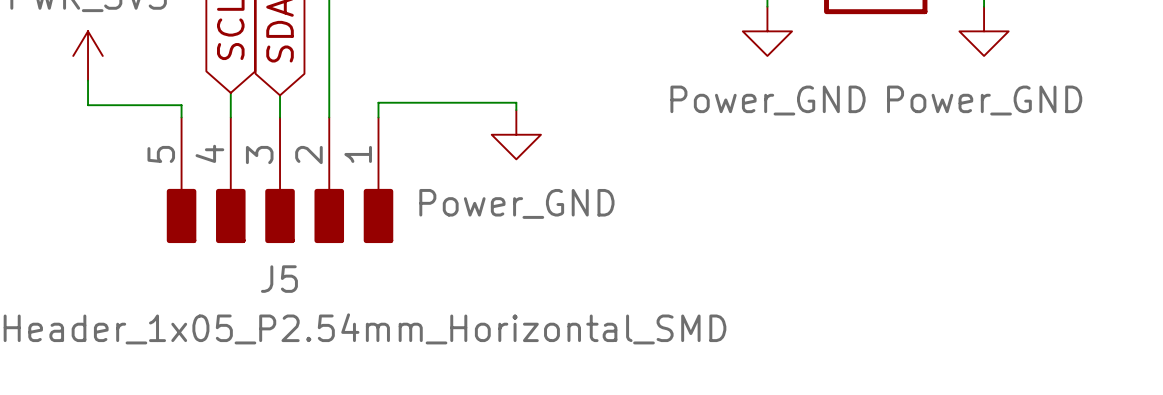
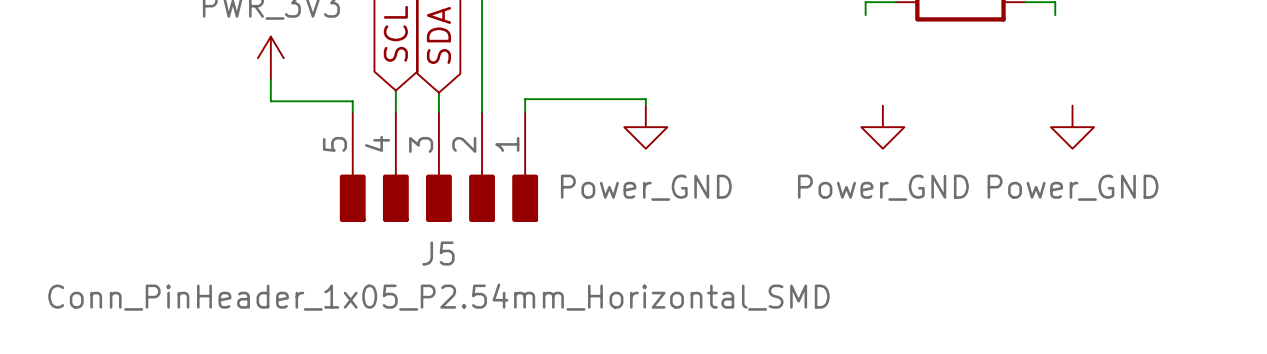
power symbol: Power_GND (767, 31) -> none
power symbol position: Power_GND (984, 31) -> Power_GND (1072, 127)
power symbol: none -> Power_GND (882, 127)

